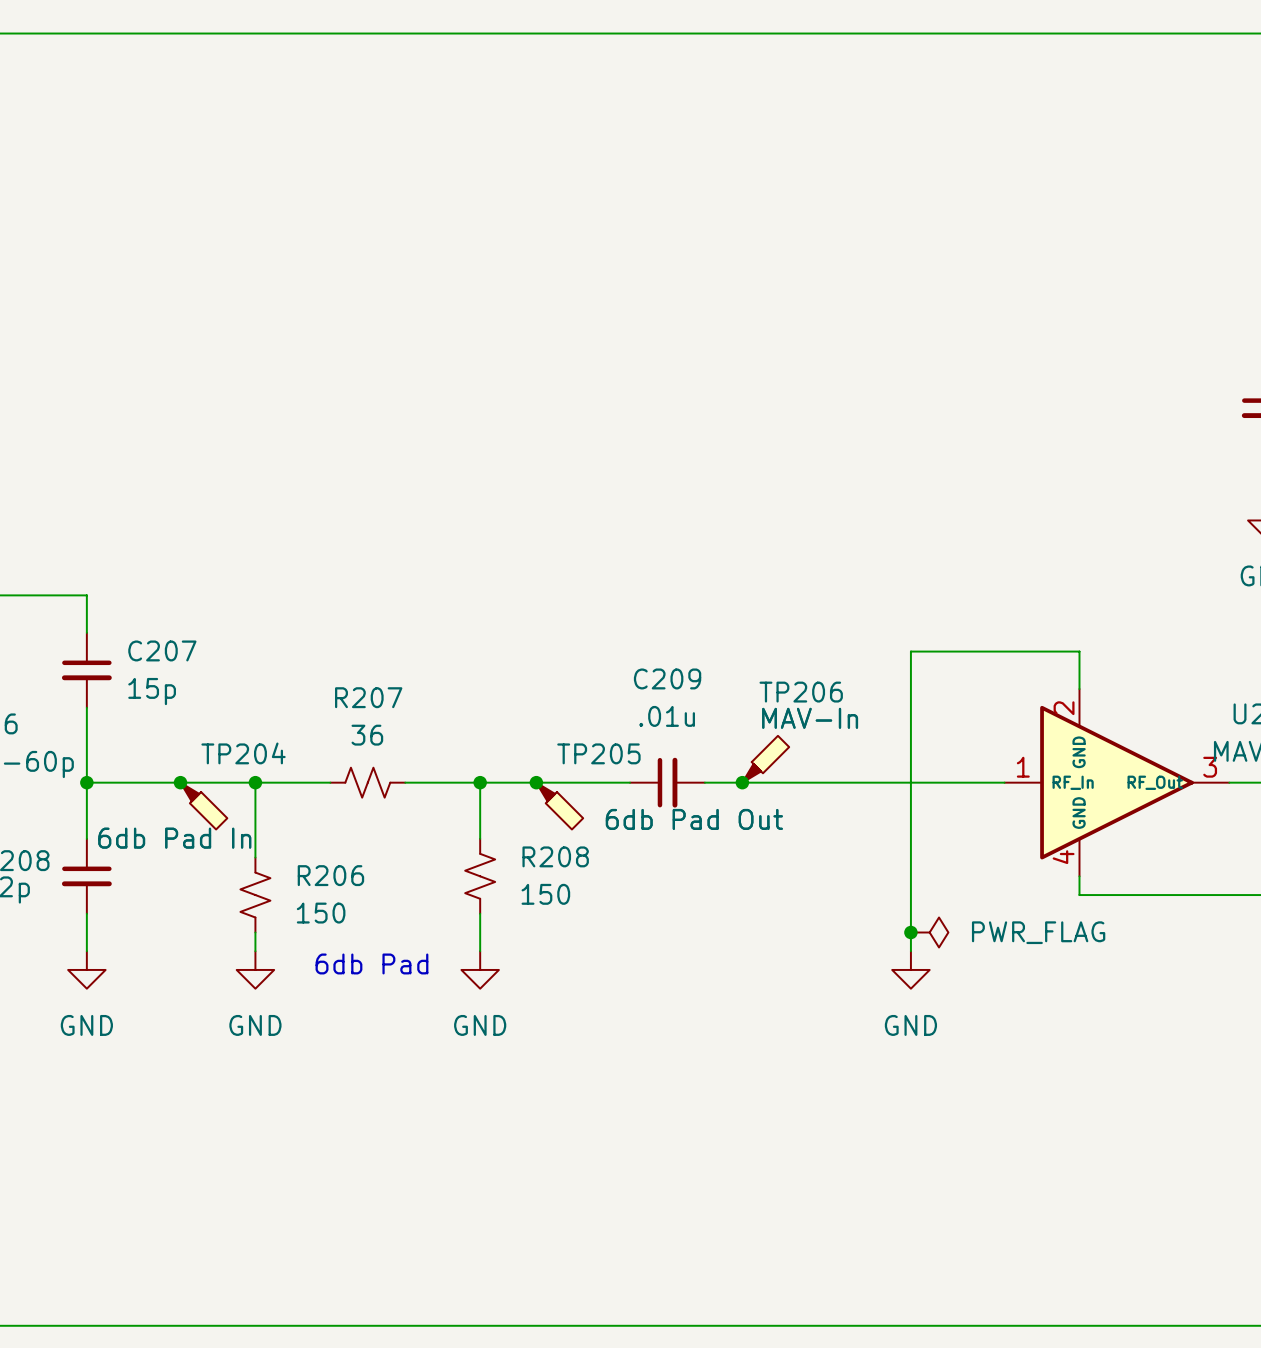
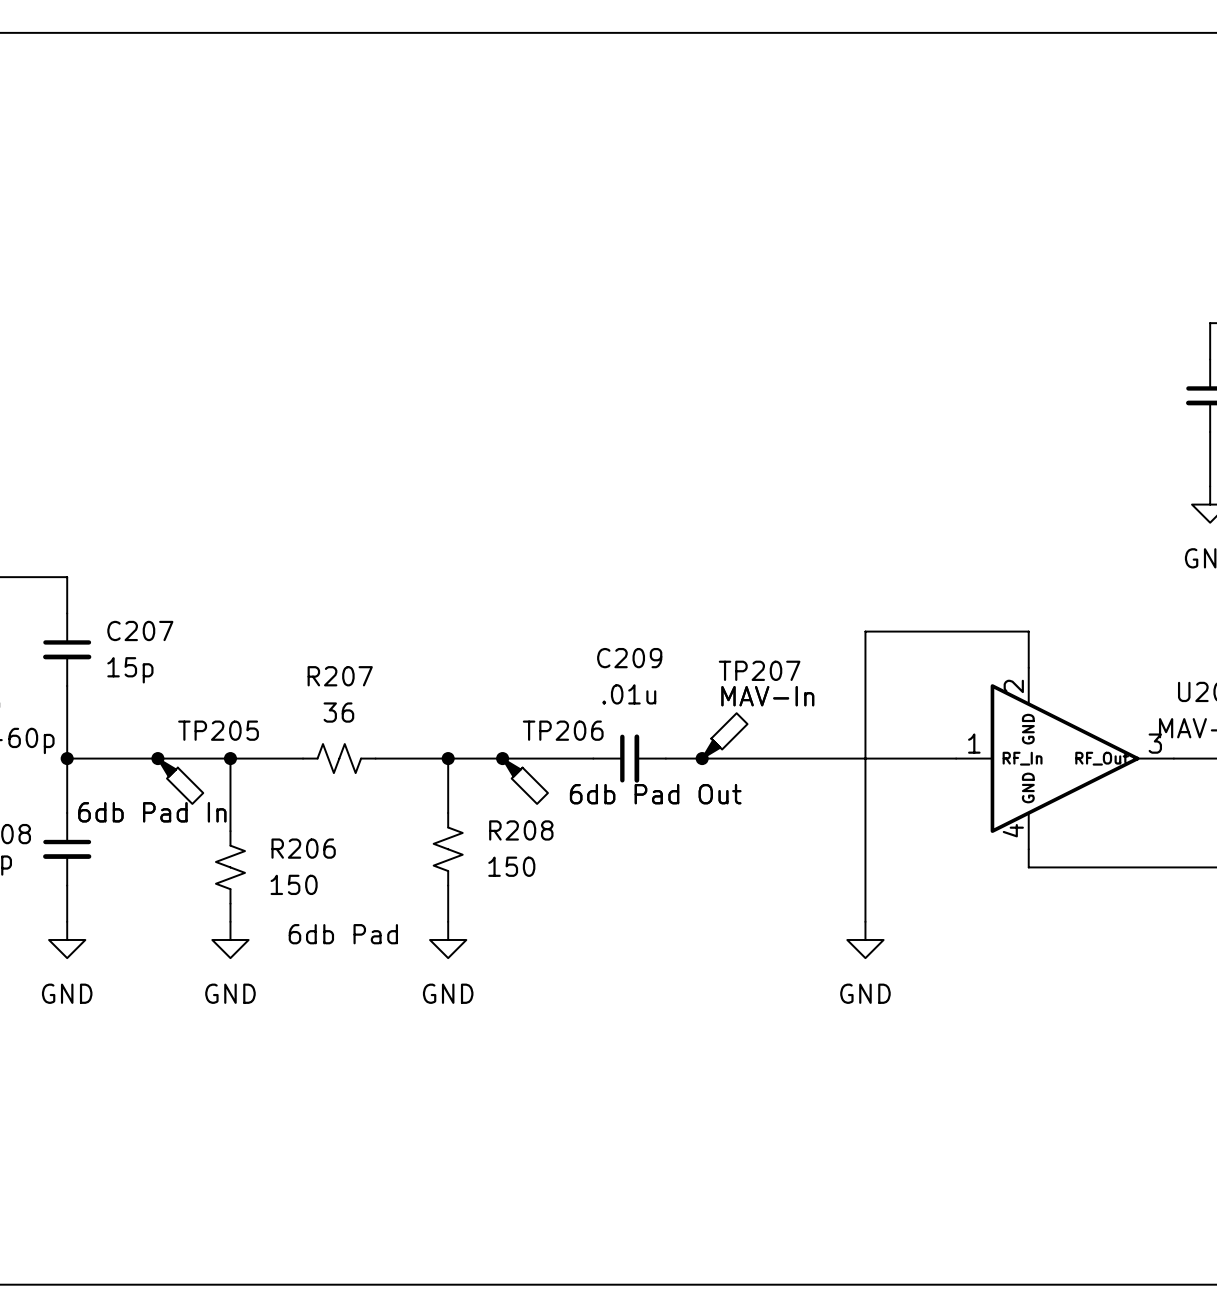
TP206 name: TP206 (801, 692) -> TP207 (759, 670)
TP204 name: TP204 (243, 753) -> TP205 (218, 730)
TP205 name: TP205 (598, 753) -> TP206 (563, 730)
junction: (910, 932) -> none
power symbol: PWR_FLAG (929, 932) -> none

